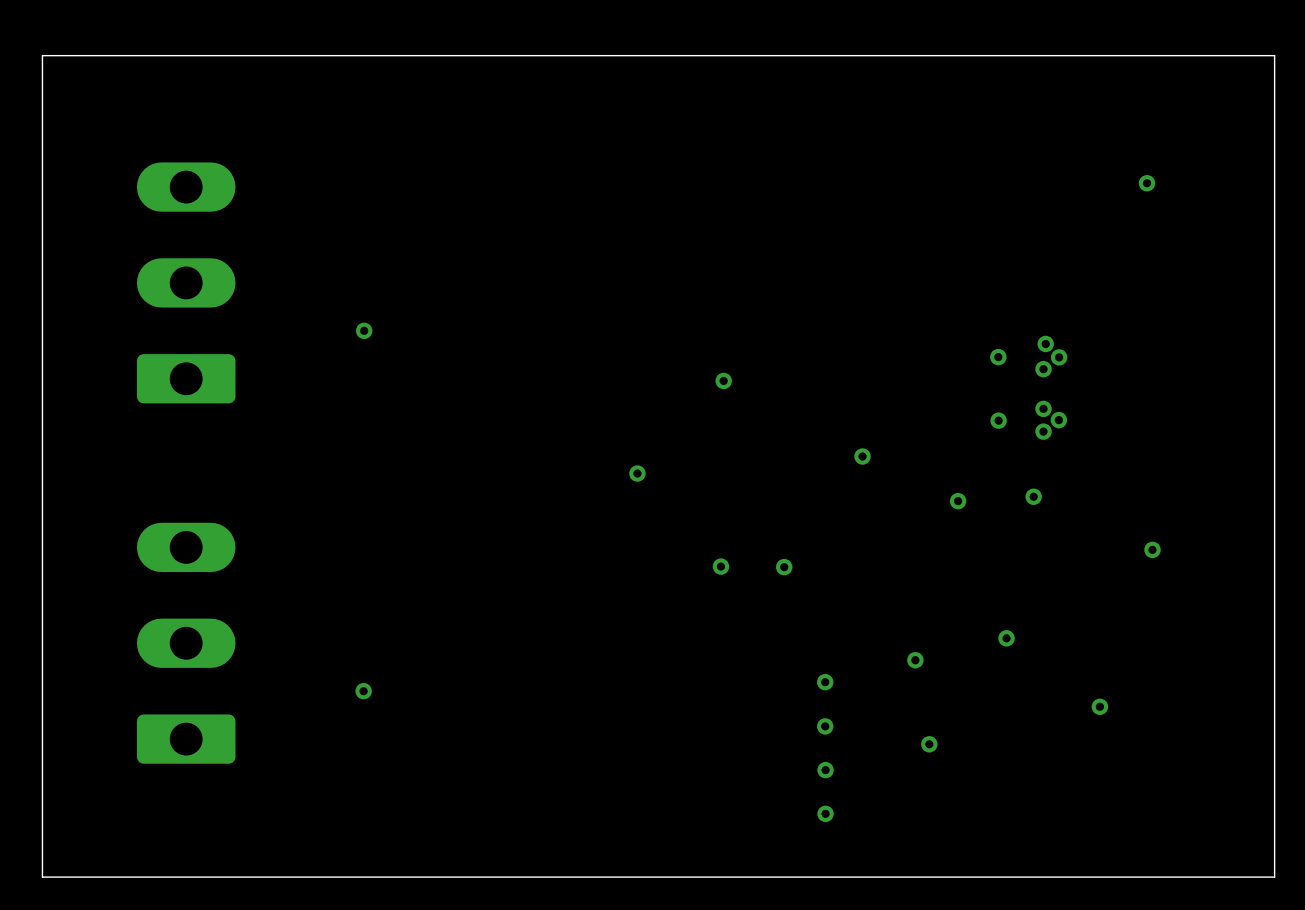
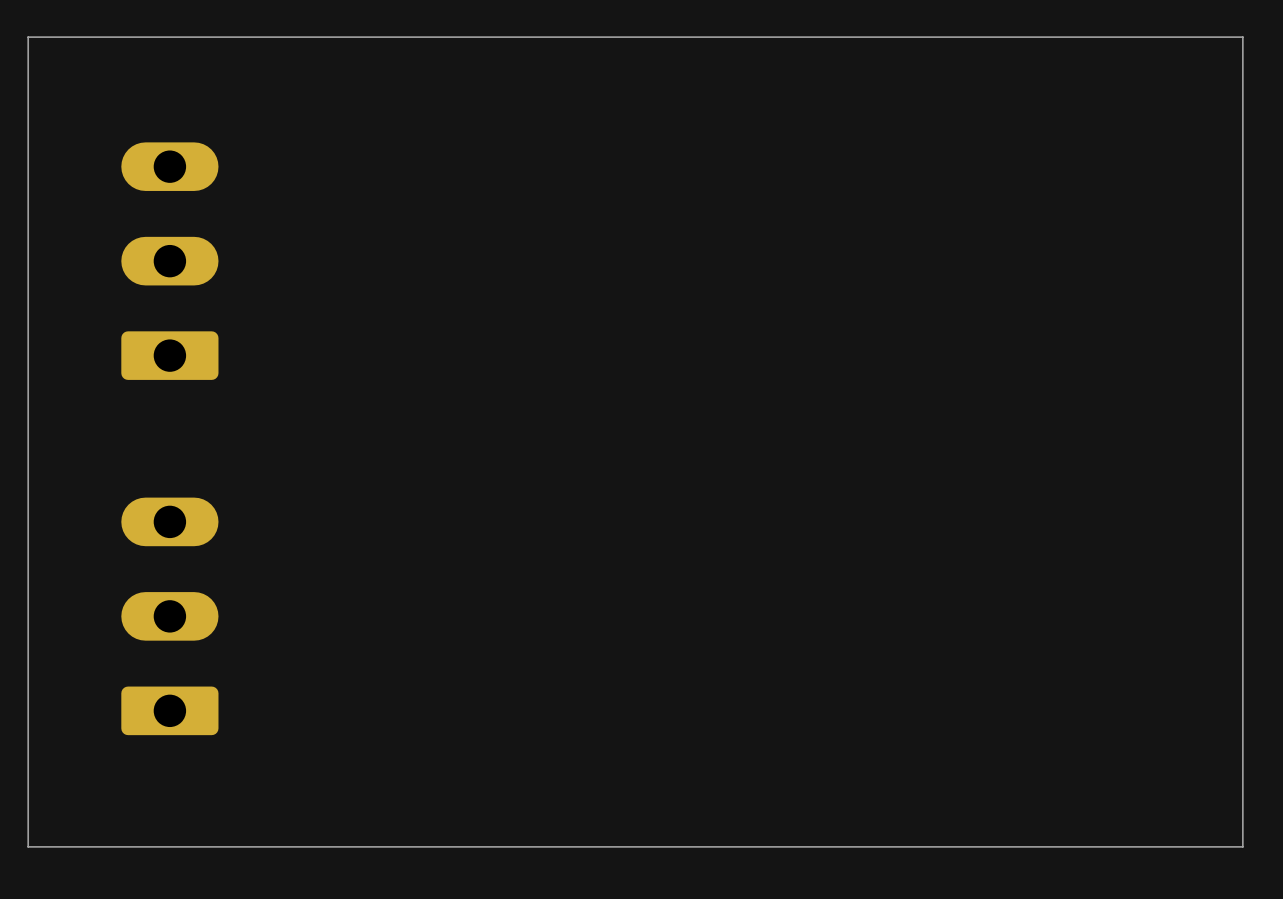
via: (1147, 183) -> none
via: (364, 330) -> none
via: (1045, 343) -> none
via: (998, 357) -> none
via: (1059, 357) -> none
via: (1043, 369) -> none
via: (723, 380) -> none
via: (1043, 408) -> none
via: (998, 420) -> none
via: (1058, 420) -> none
via: (1043, 431) -> none
via: (862, 456) -> none
via: (637, 473) -> none
via: (1033, 496) -> none
via: (958, 501) -> none
via: (1152, 549) -> none
via: (720, 566) -> none
via: (784, 567) -> none
via: (1006, 638) -> none
via: (915, 660) -> none
via: (825, 682) -> none
via: (363, 691) -> none
via: (1099, 706) -> none
via: (825, 726) -> none
via: (929, 744) -> none
via: (825, 770) -> none
via: (825, 813) -> none

